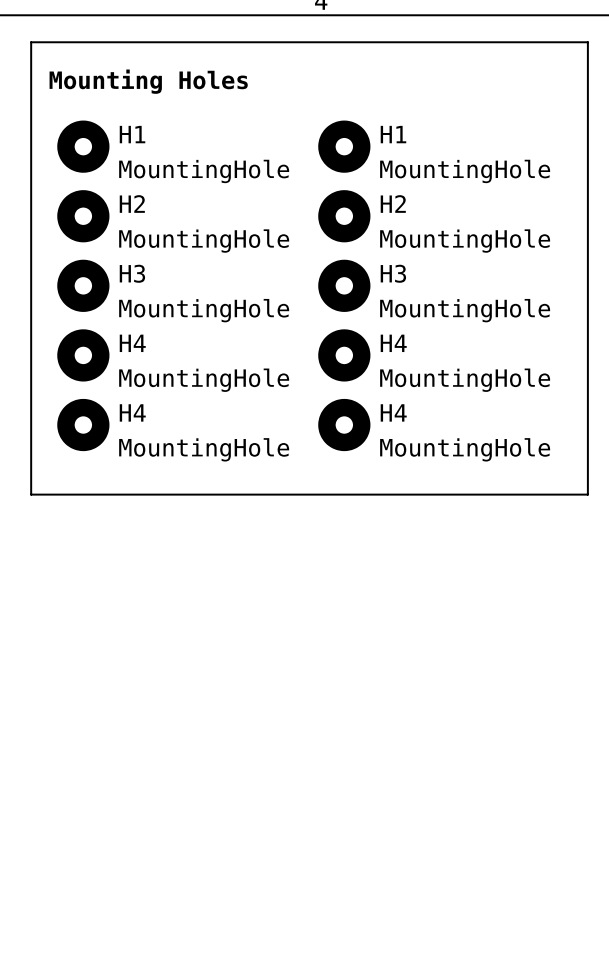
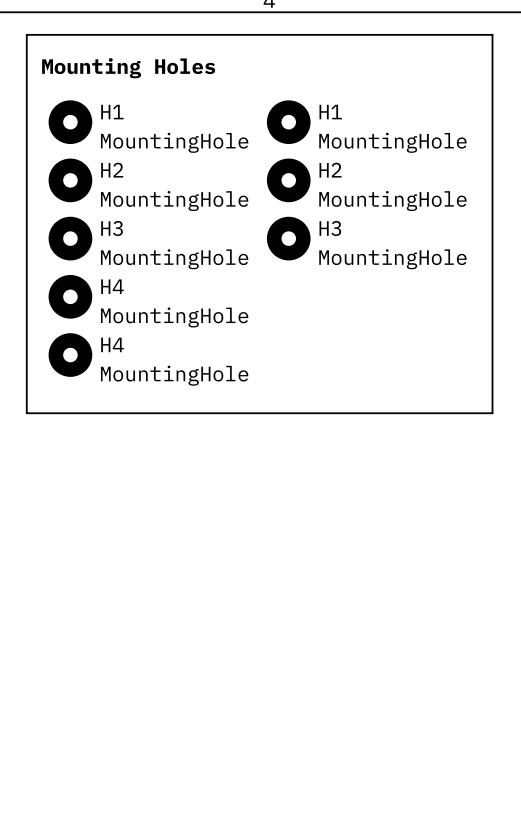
H4: MountingHole (344, 355) -> none
H4: MountingHole (344, 425) -> none

